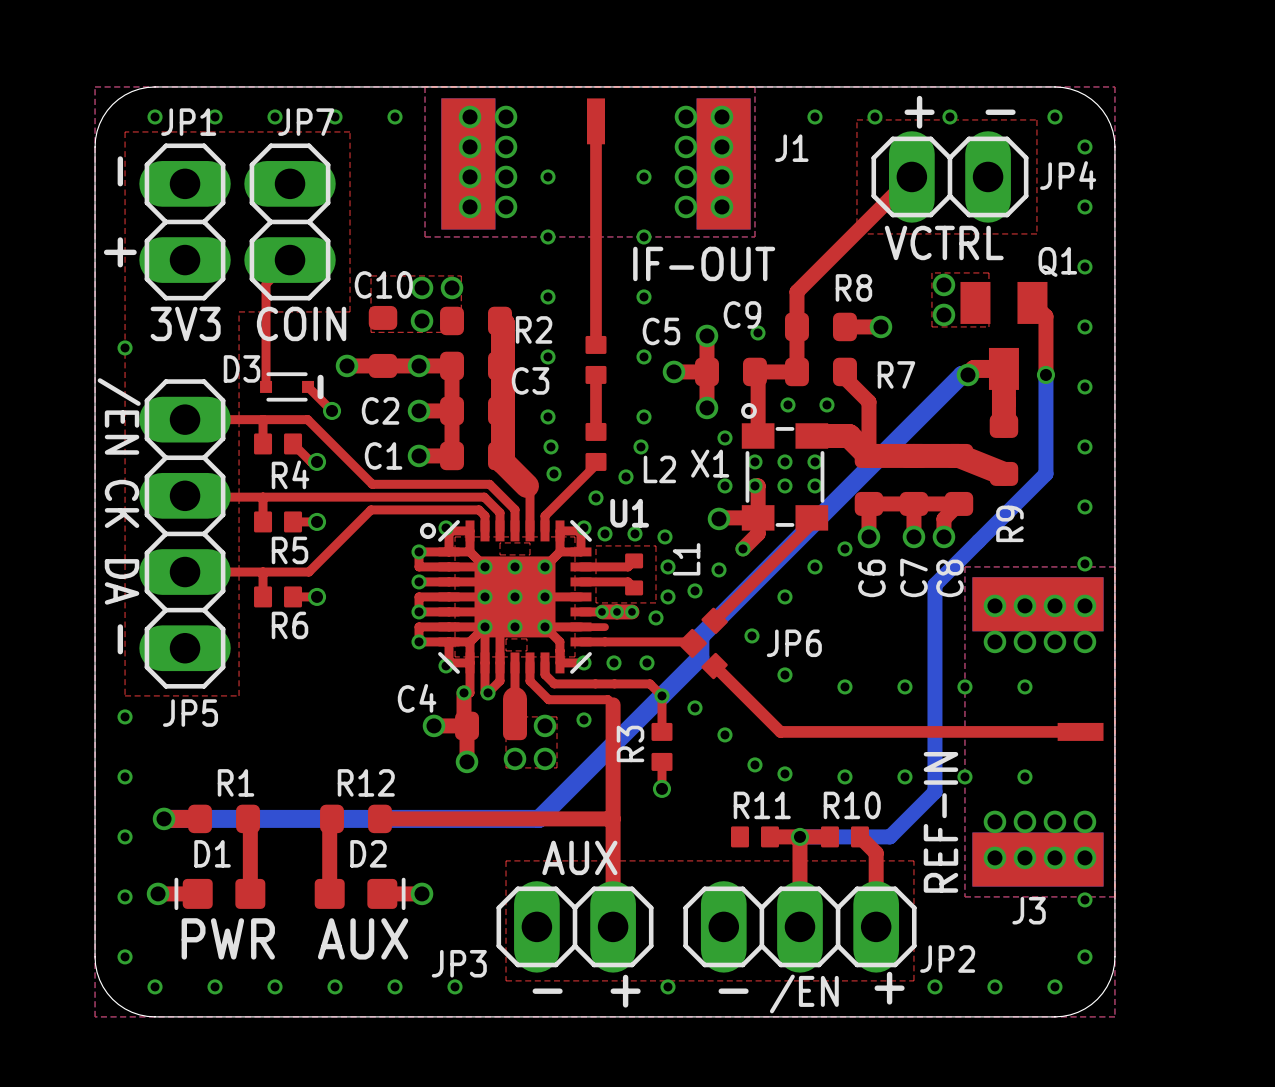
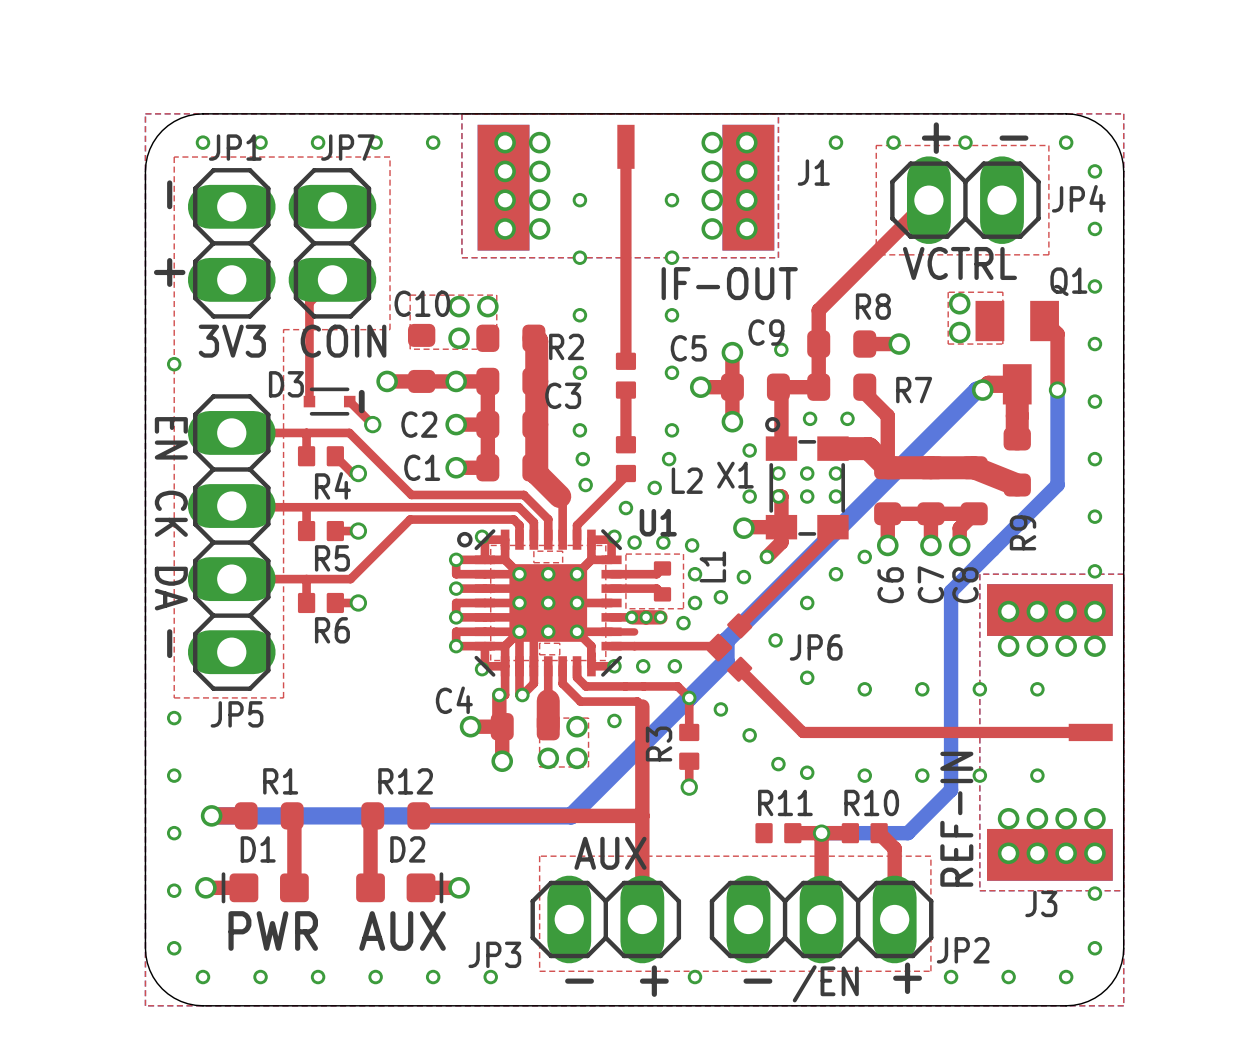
text: /EN (119, 416) -> EN (171, 438)

